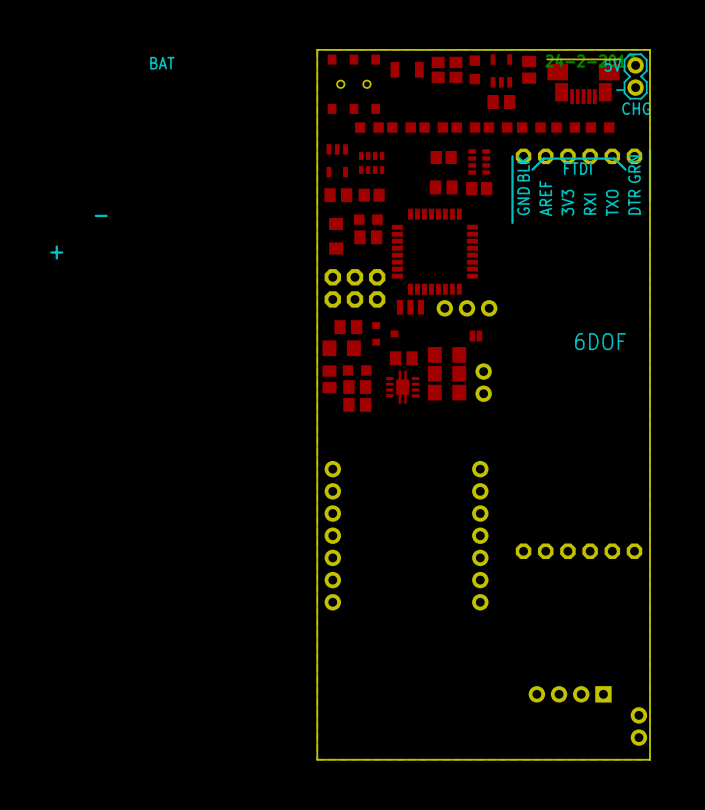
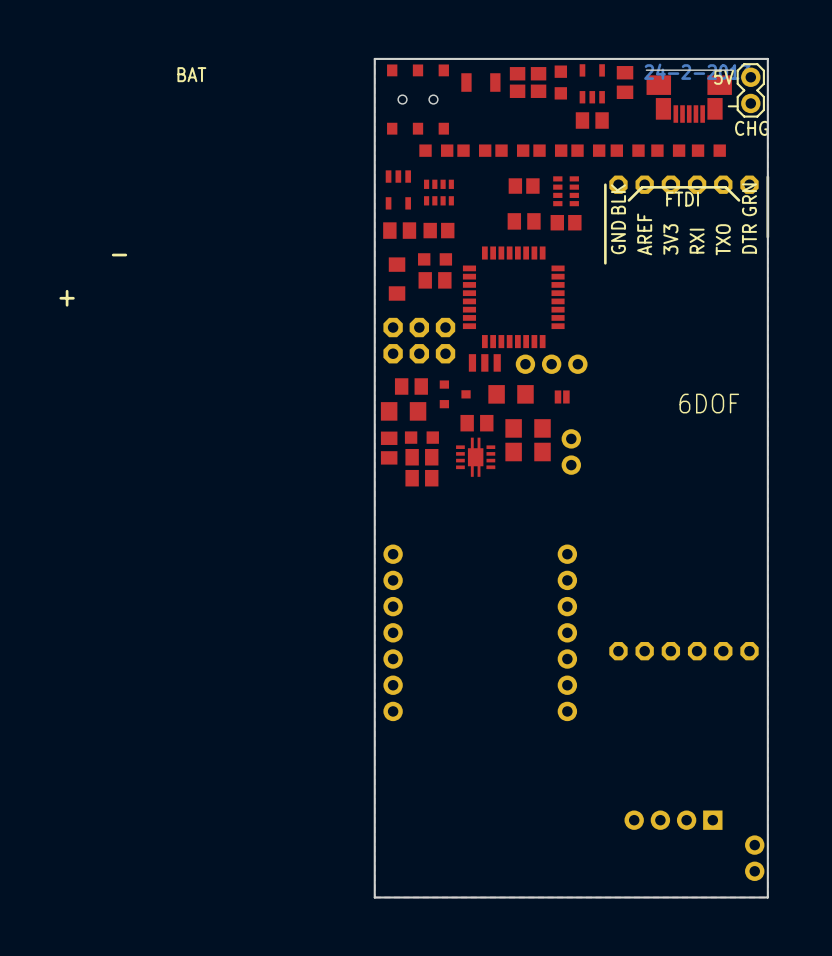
part: none -> (511, 394)
part: (447, 354) -> none
part: none -> (528, 428)
part: (447, 373) -> none
part: none -> (528, 452)
part: (447, 392) -> none

